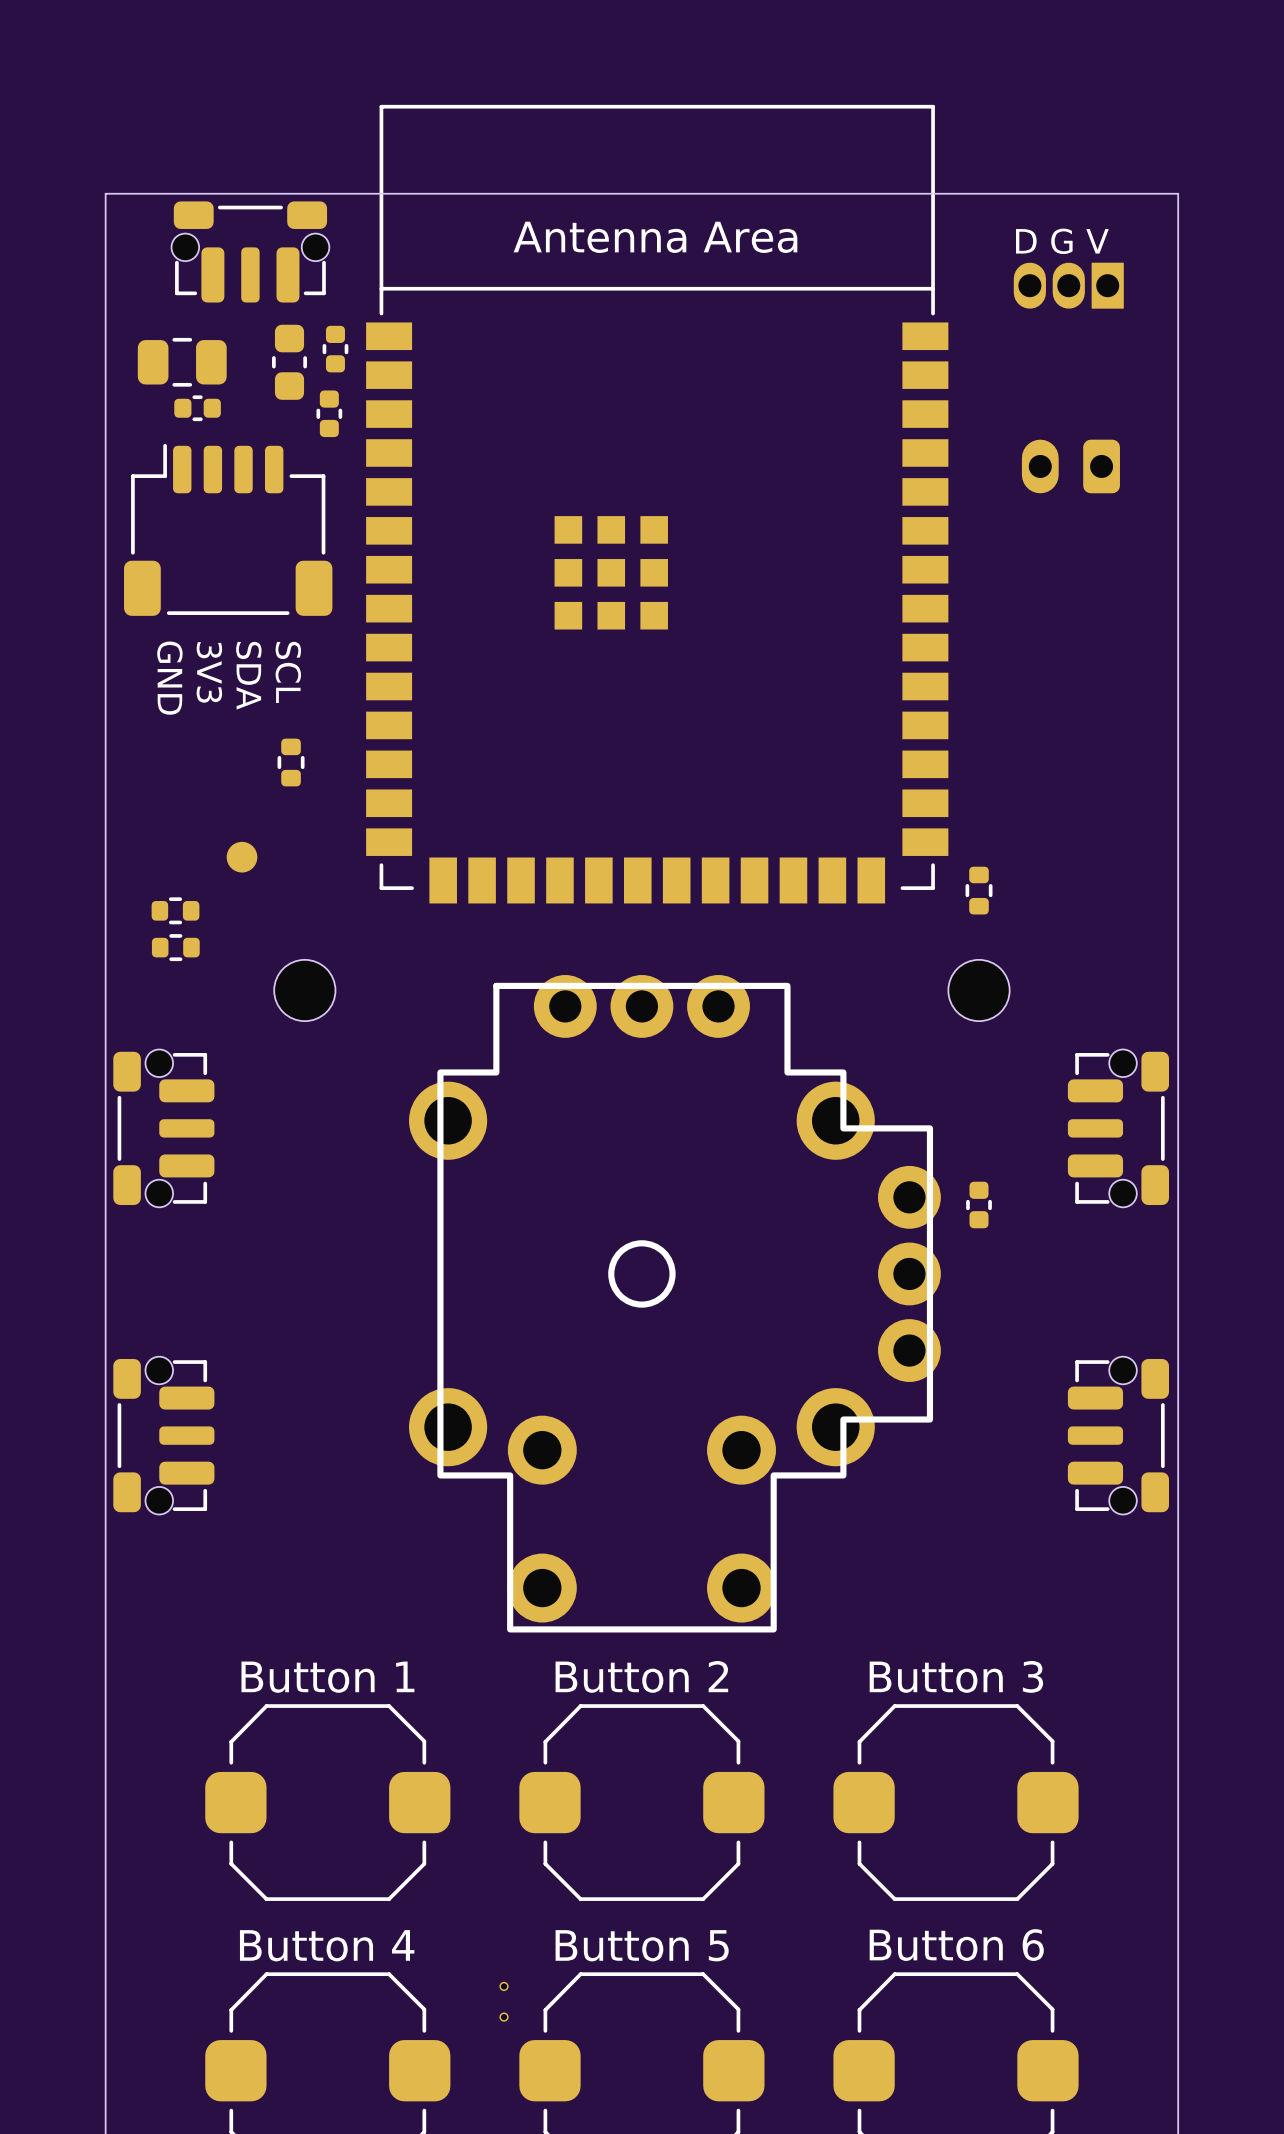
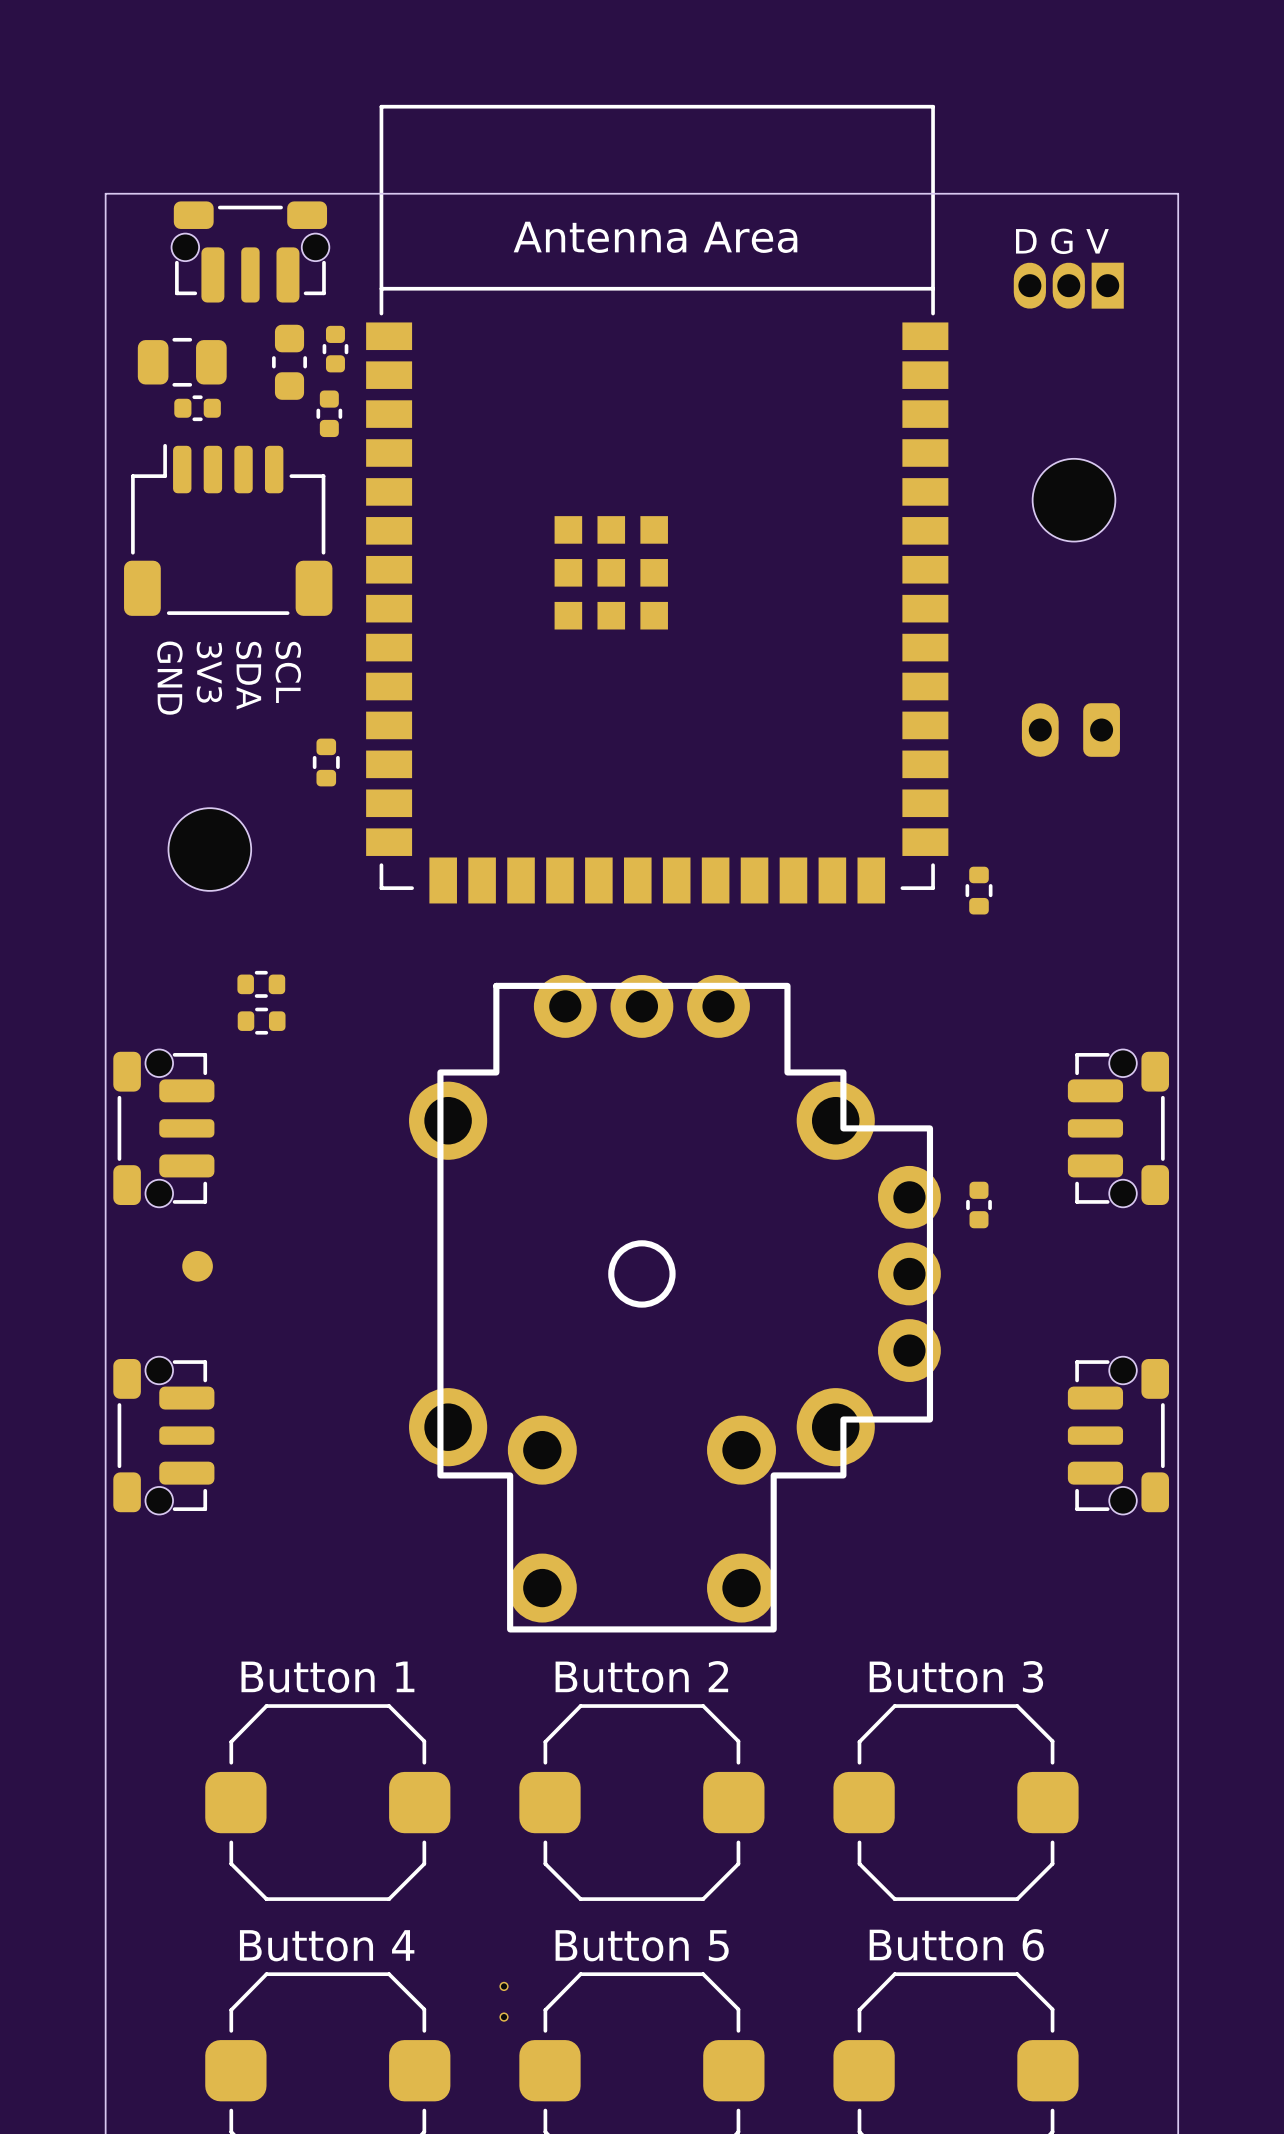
part position: (1070, 466) -> (1070, 730)
part: none -> (1074, 500)
part position: (291, 762) -> (326, 762)
part: none -> (209, 849)
part position: (242, 857) -> (197, 1266)
part: (175, 910) -> none
part: (175, 947) -> none
part: none -> (261, 984)
part: (304, 990) -> none
part: (979, 990) -> none
part: none -> (261, 1021)

